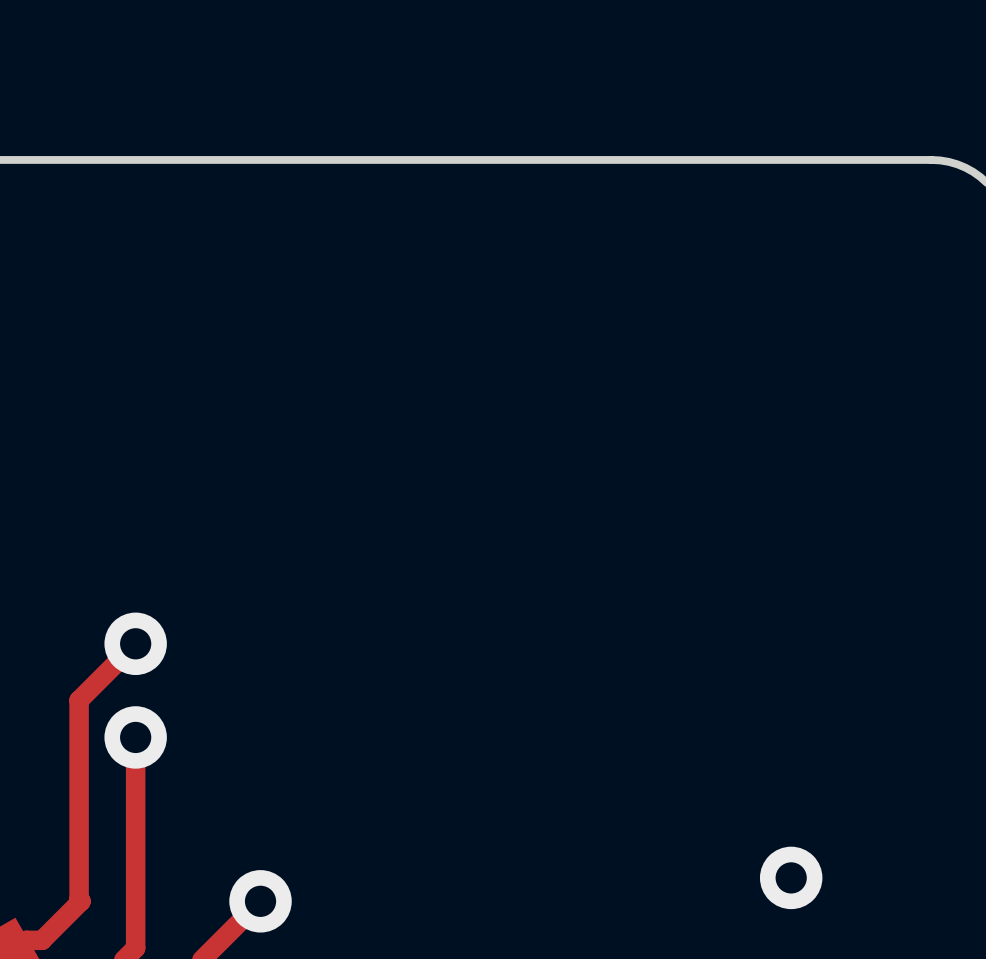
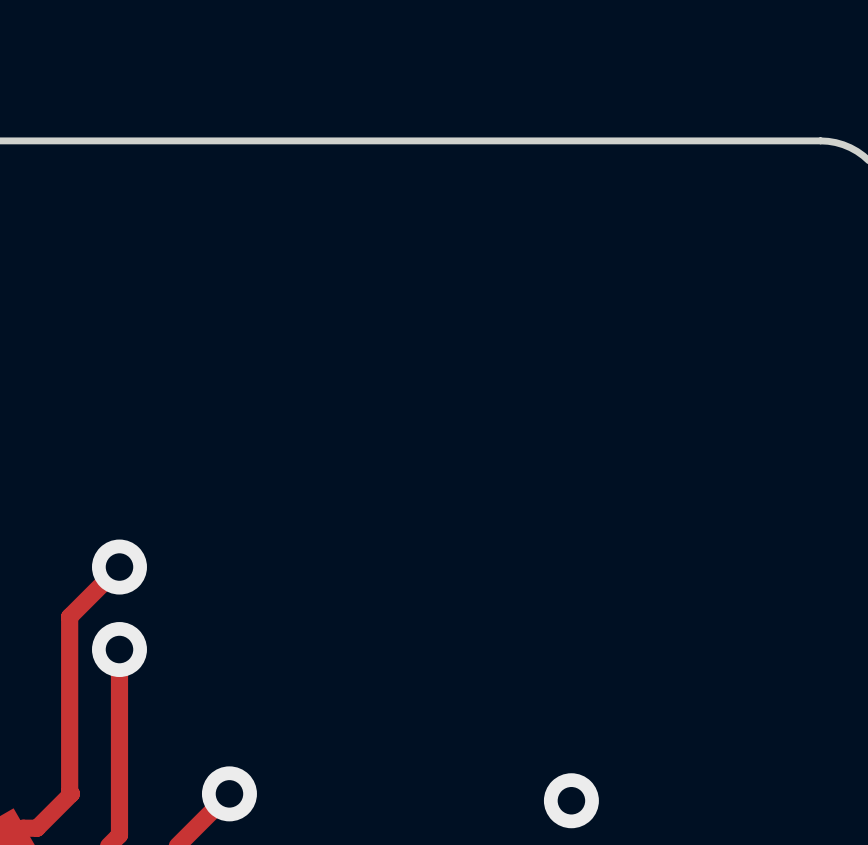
via position: (791, 877) -> (571, 800)

